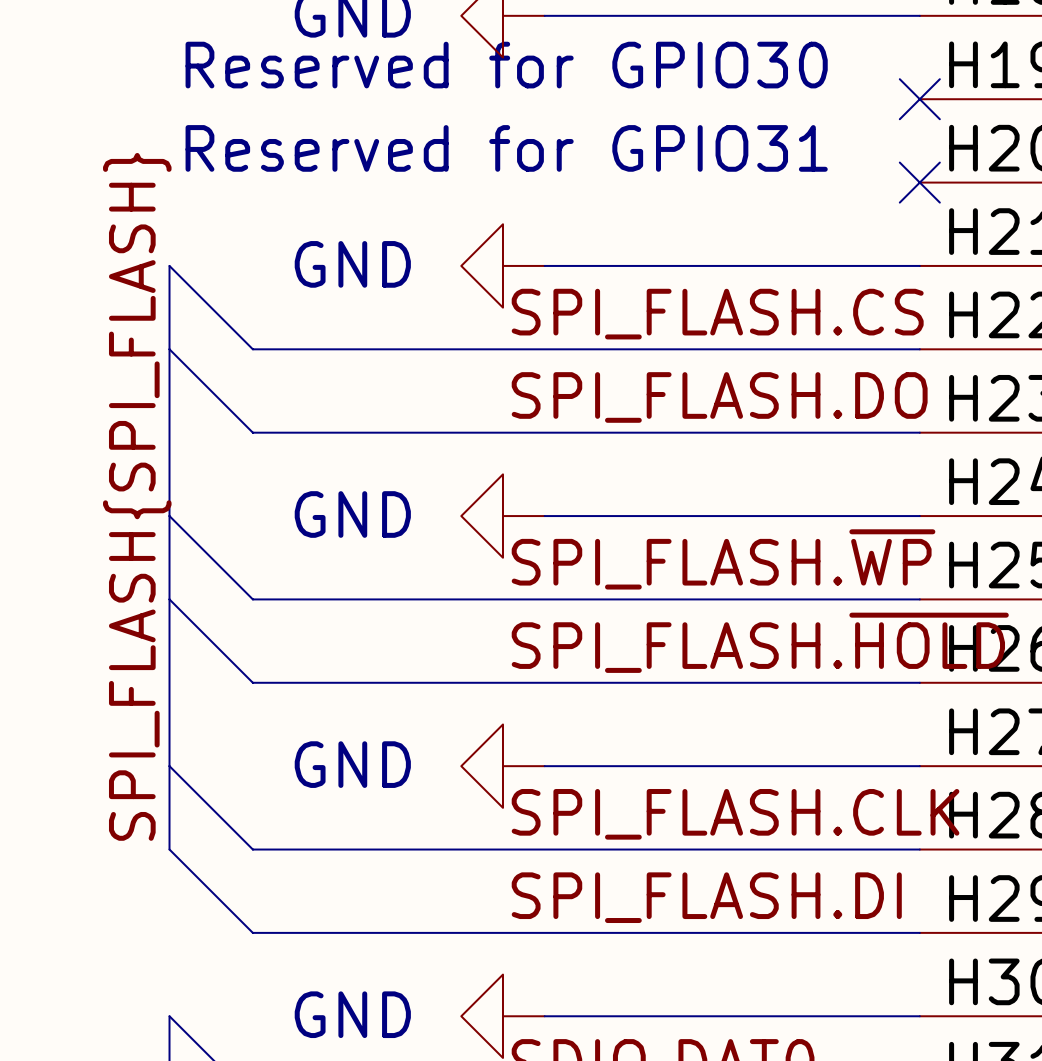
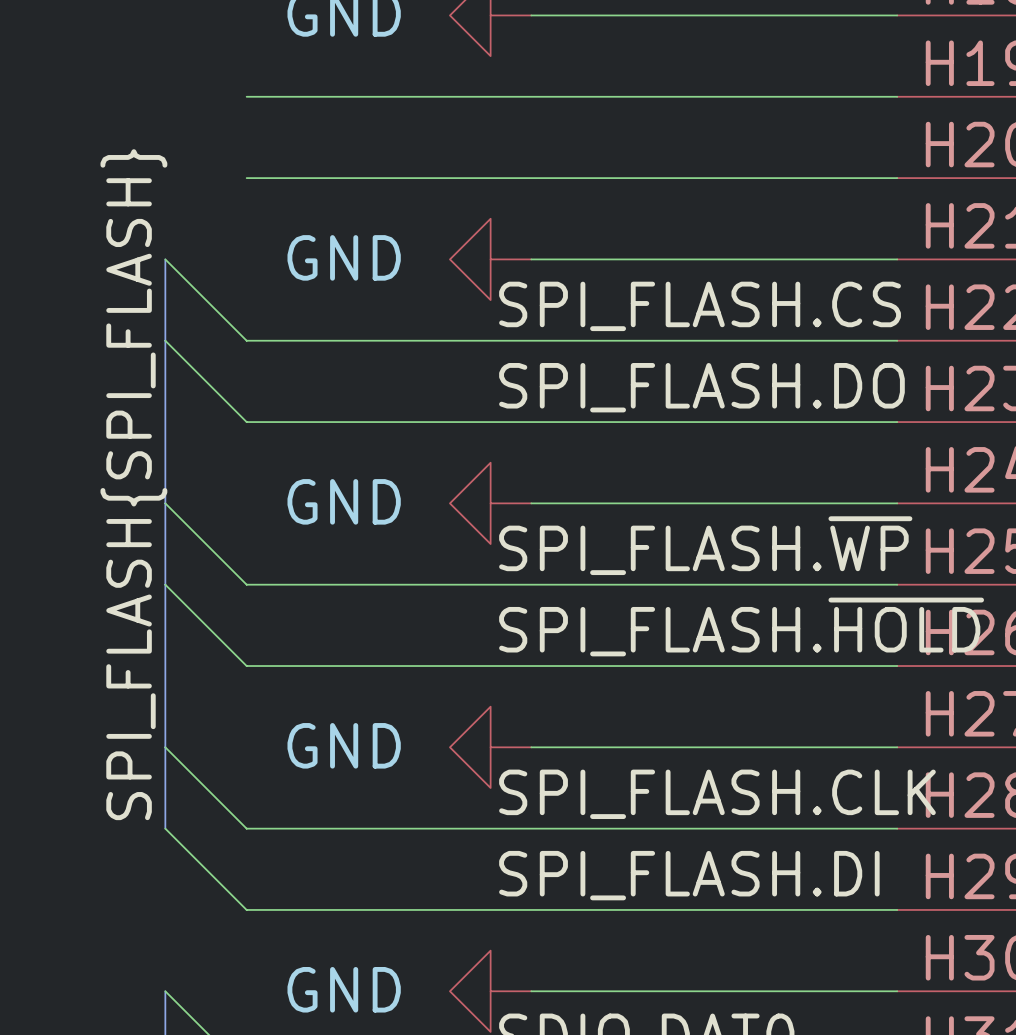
text: Reserved for GPIO30 (506, 65) -> none
wire: none -> (246, 96) (897, 96)
no-connect mark: (919, 99) -> none
text: Reserved for GPIO31 (506, 148) -> none
wire: none -> (246, 178) (897, 178)
no-connect mark: (919, 182) -> none

